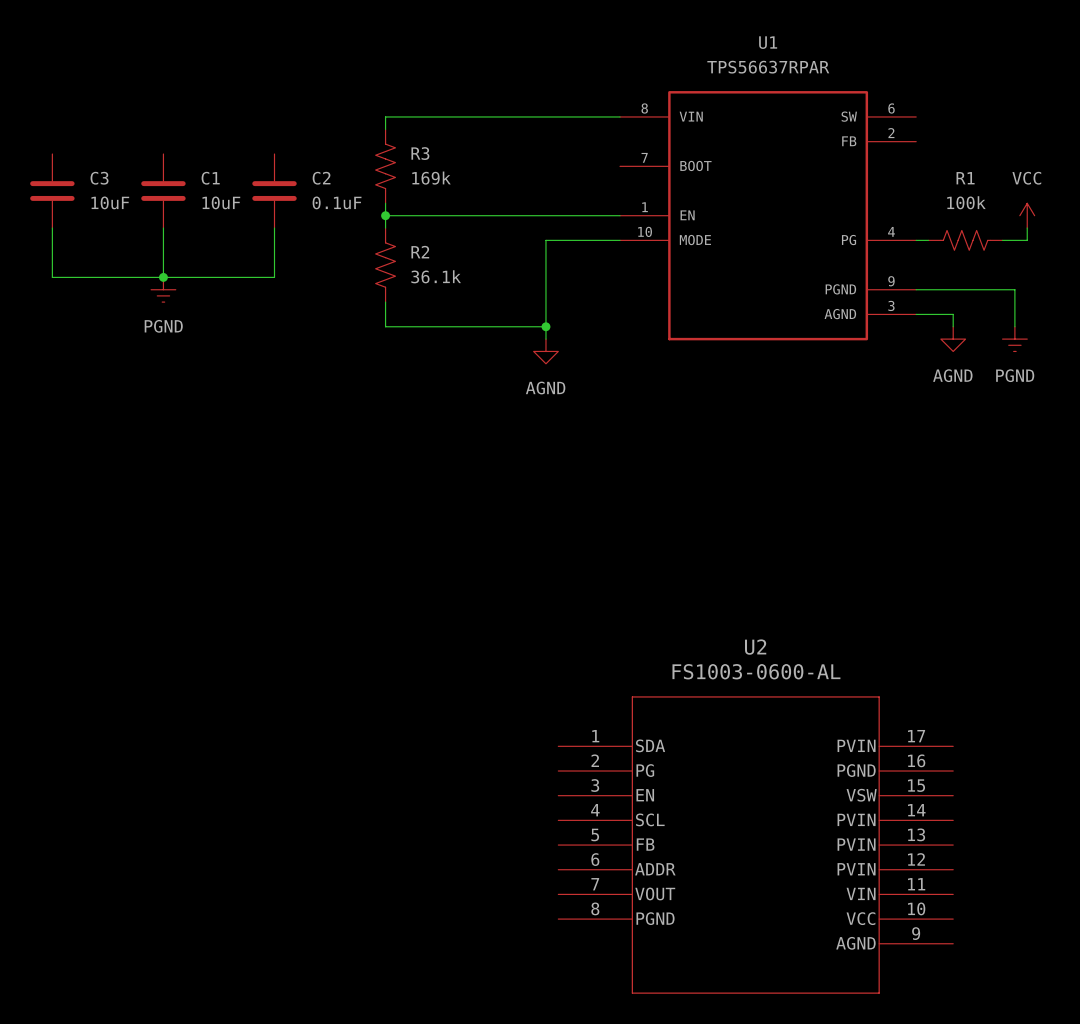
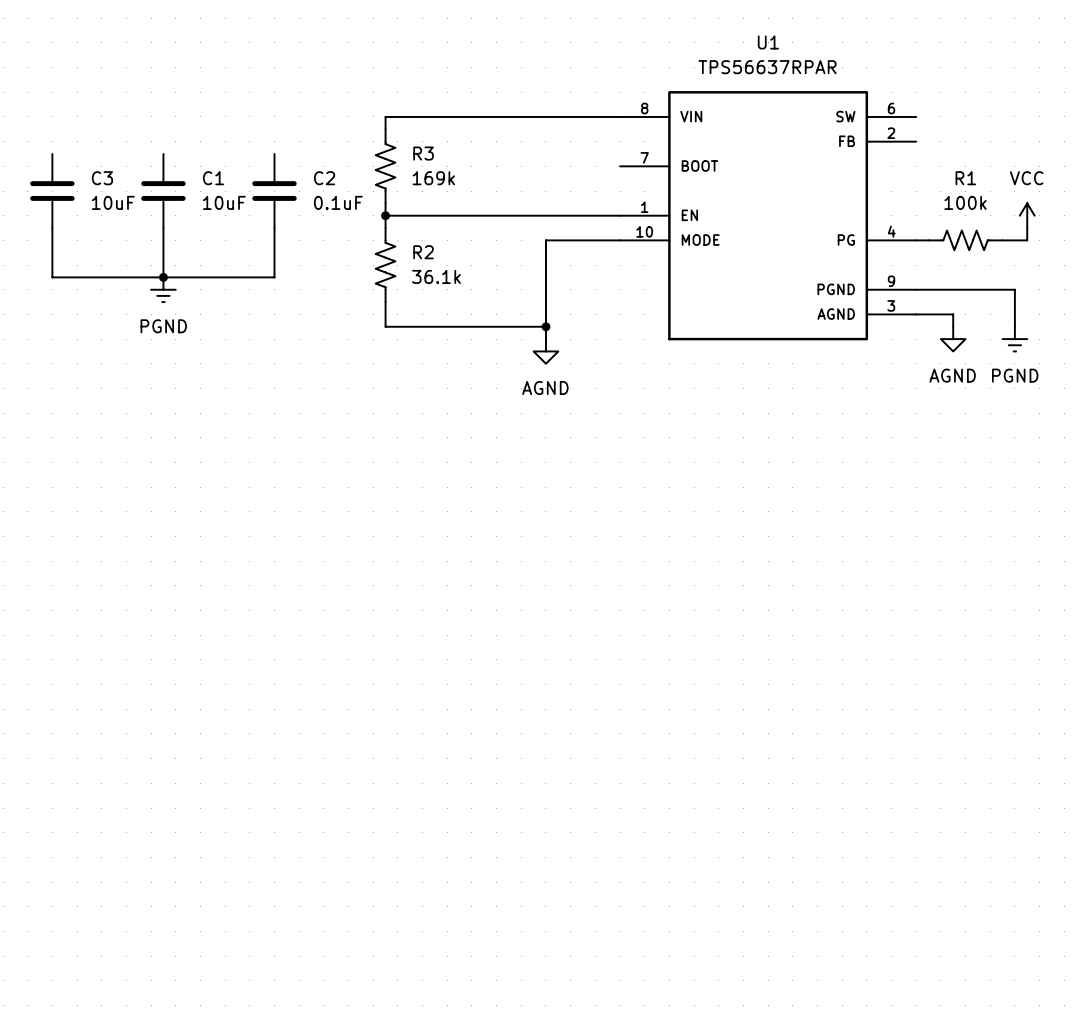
U2: FS1003-0600-AL (755, 845) -> none

